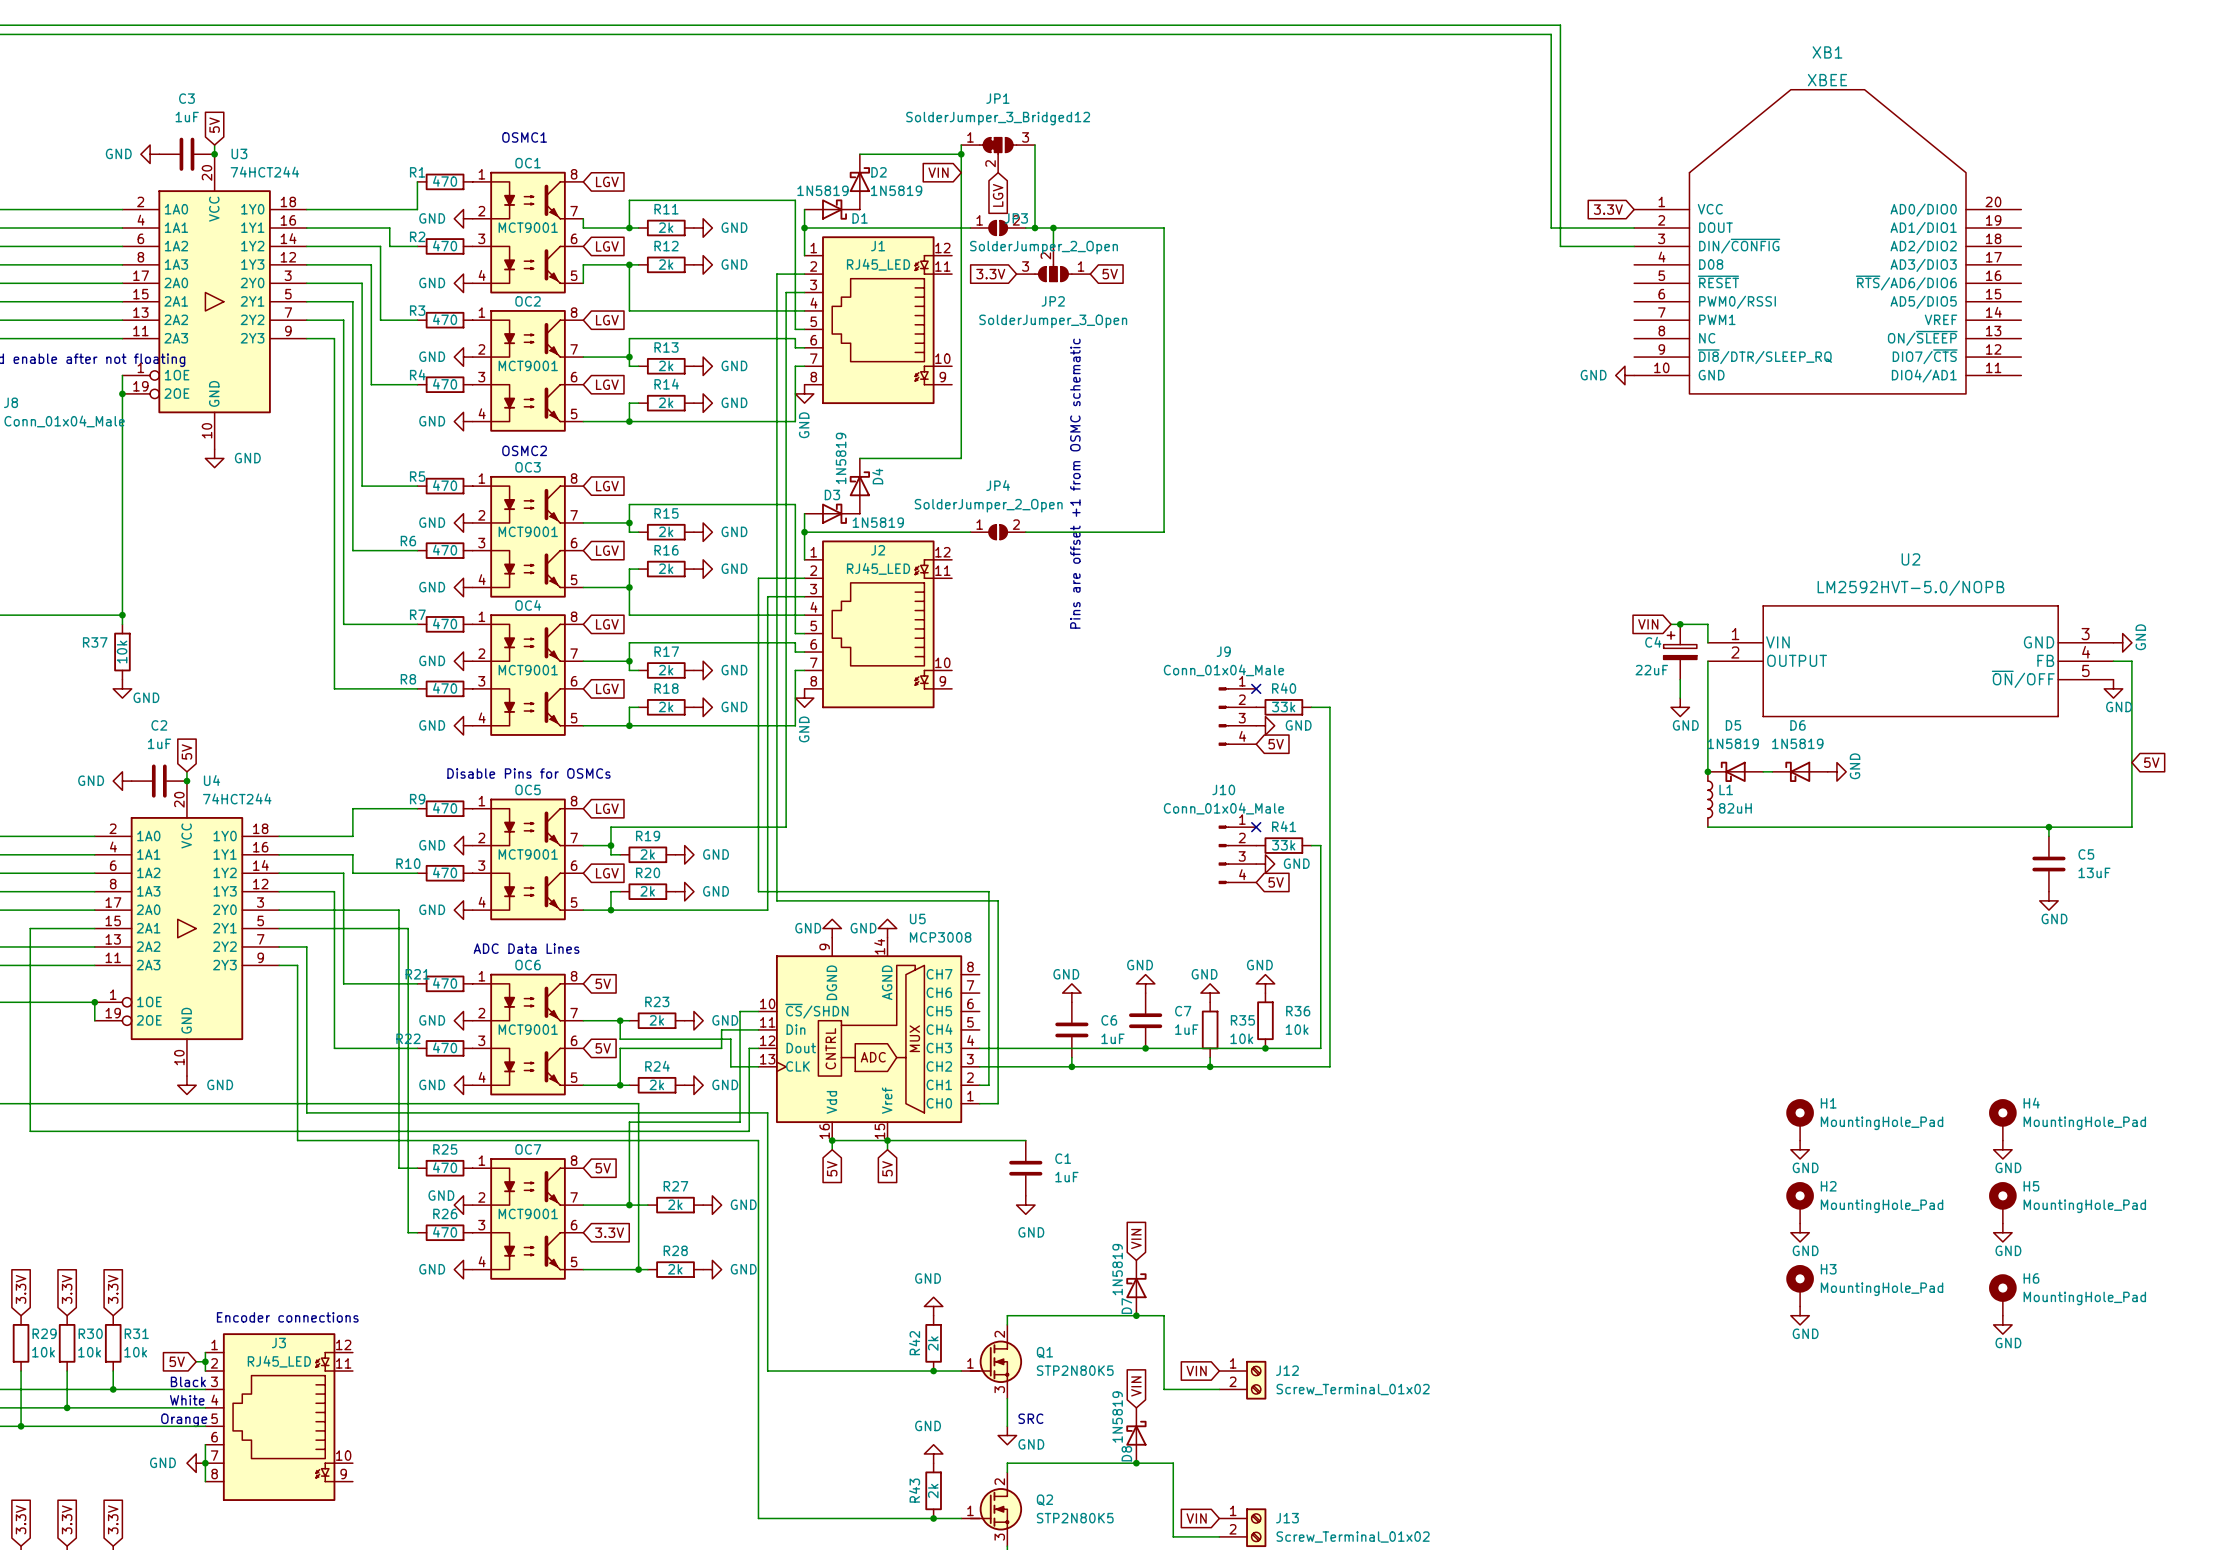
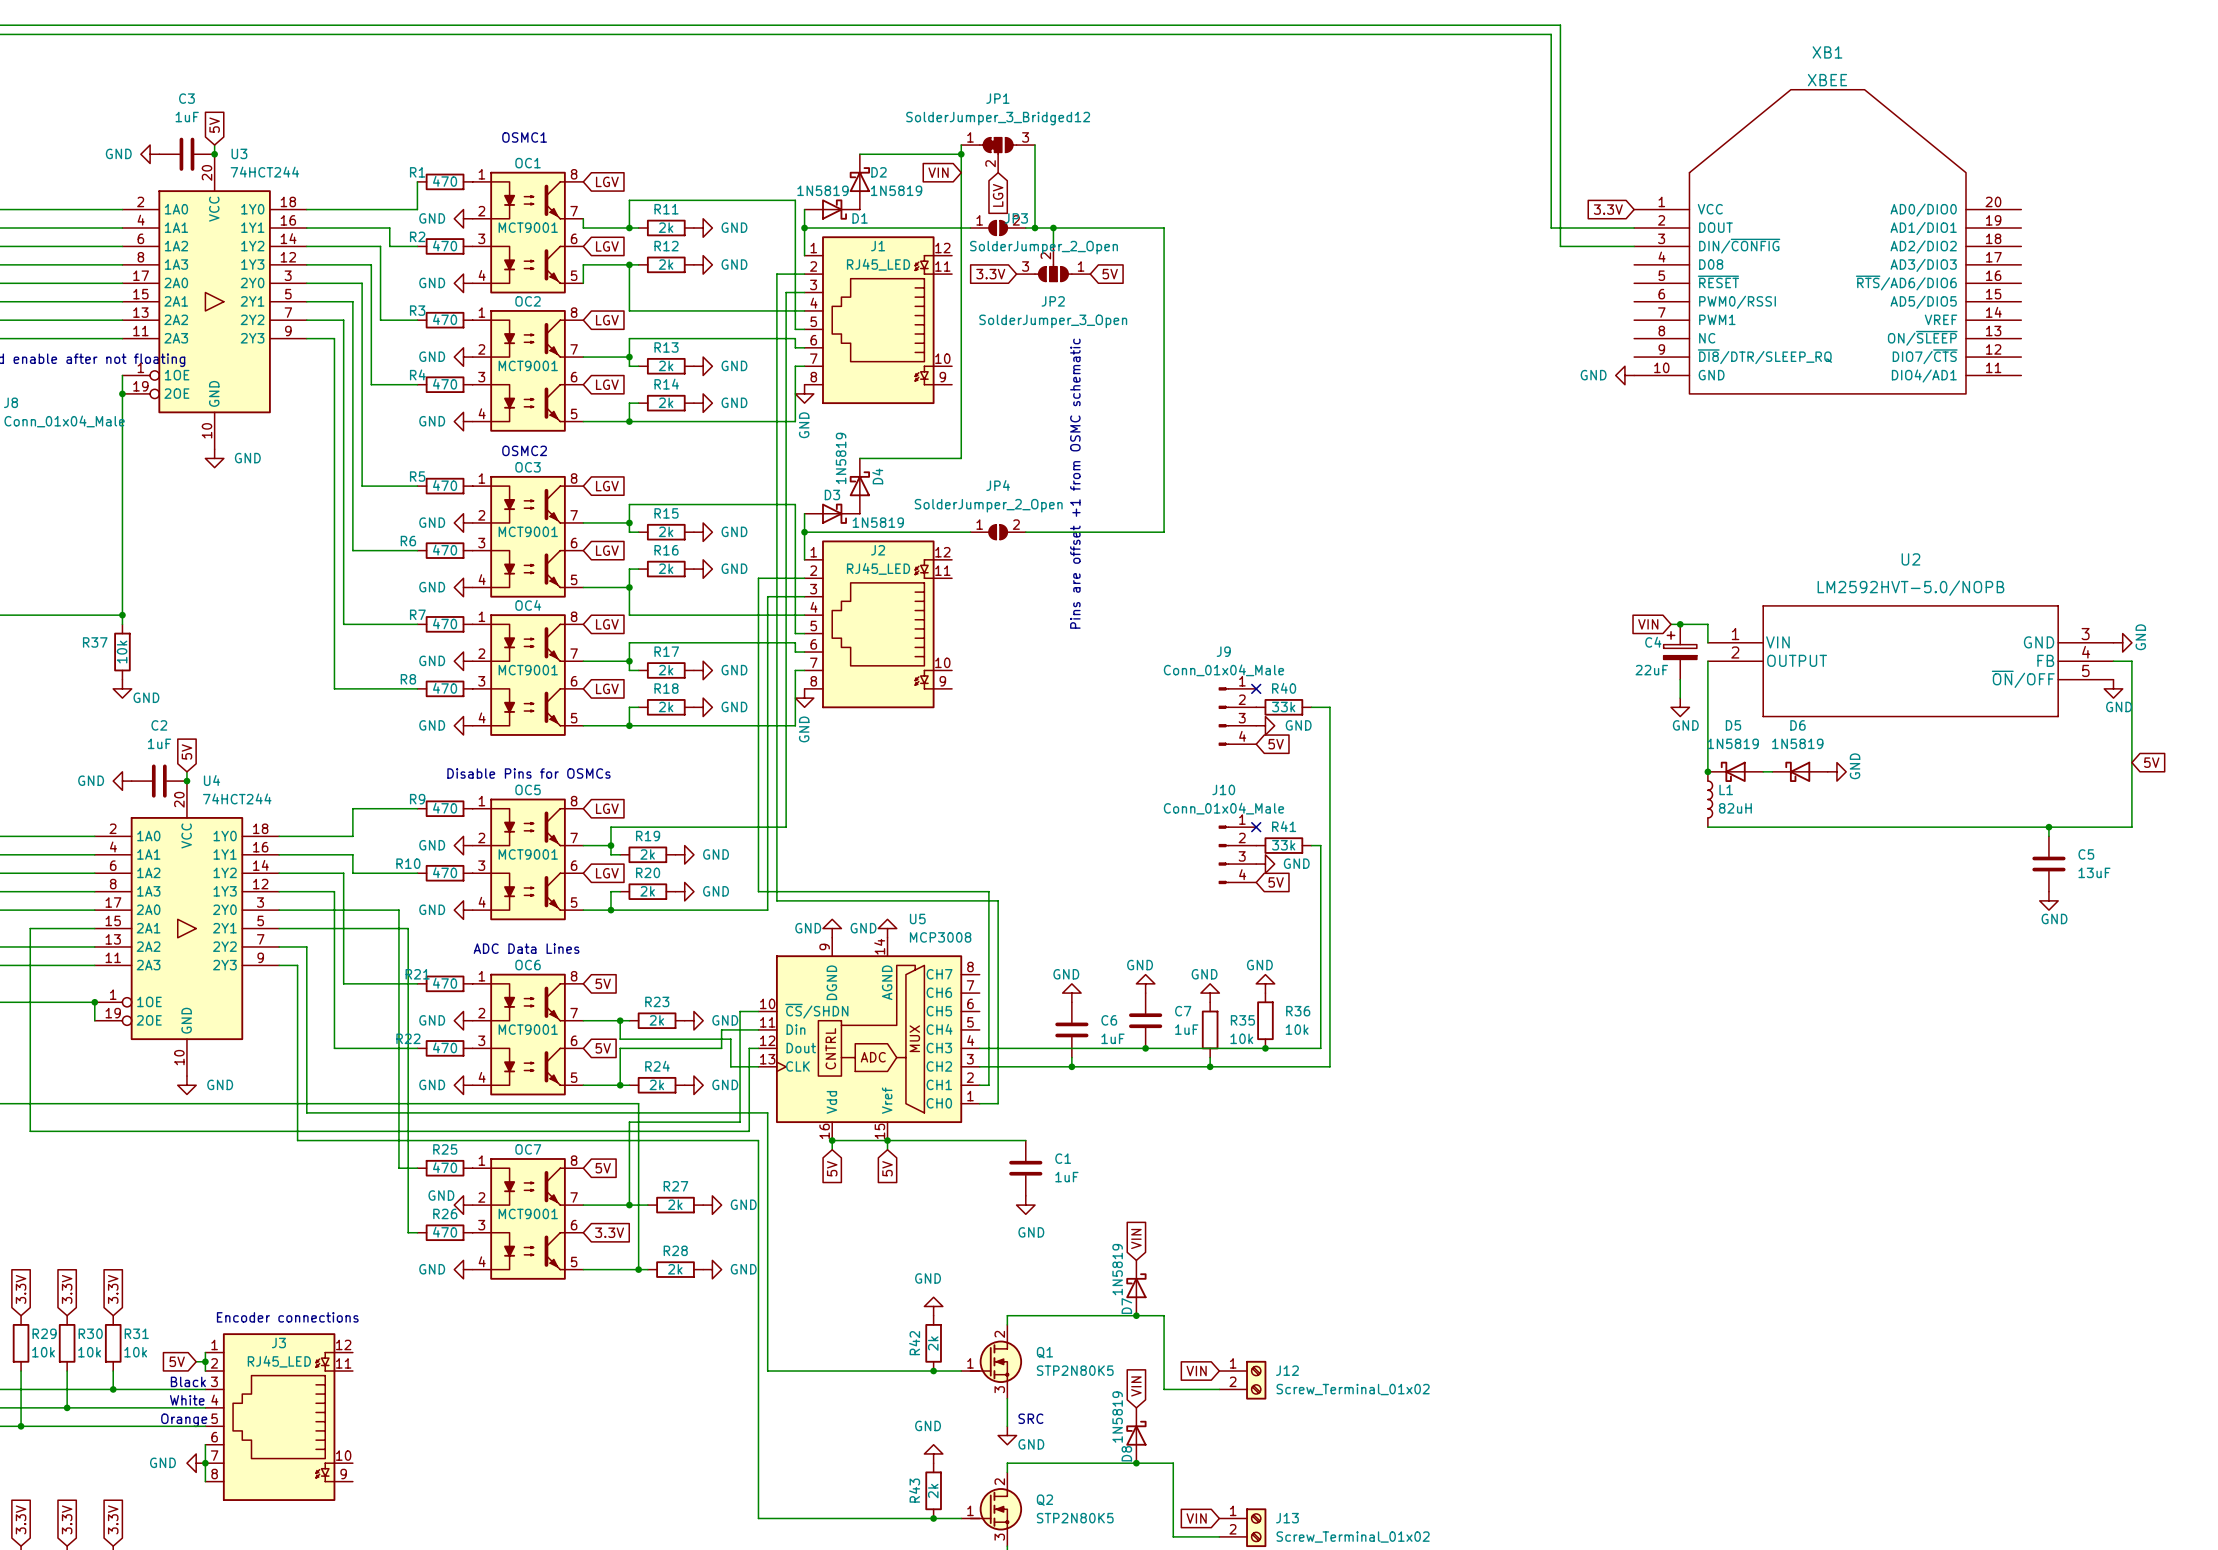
H1: MountingHole_Pad (1800, 1119) -> none
H4: MountingHole_Pad (2002, 1119) -> none
power symbol: GND (1800, 1149) -> none
power symbol: GND (2002, 1149) -> none
H2: MountingHole_Pad (1800, 1202) -> none
H5: MountingHole_Pad (2002, 1202) -> none
power symbol: GND (1800, 1232) -> none
power symbol: GND (2002, 1232) -> none
H3: MountingHole_Pad (1800, 1285) -> none
H6: MountingHole_Pad (2002, 1294) -> none
power symbol: GND (1800, 1315) -> none
power symbol: GND (2002, 1324) -> none

